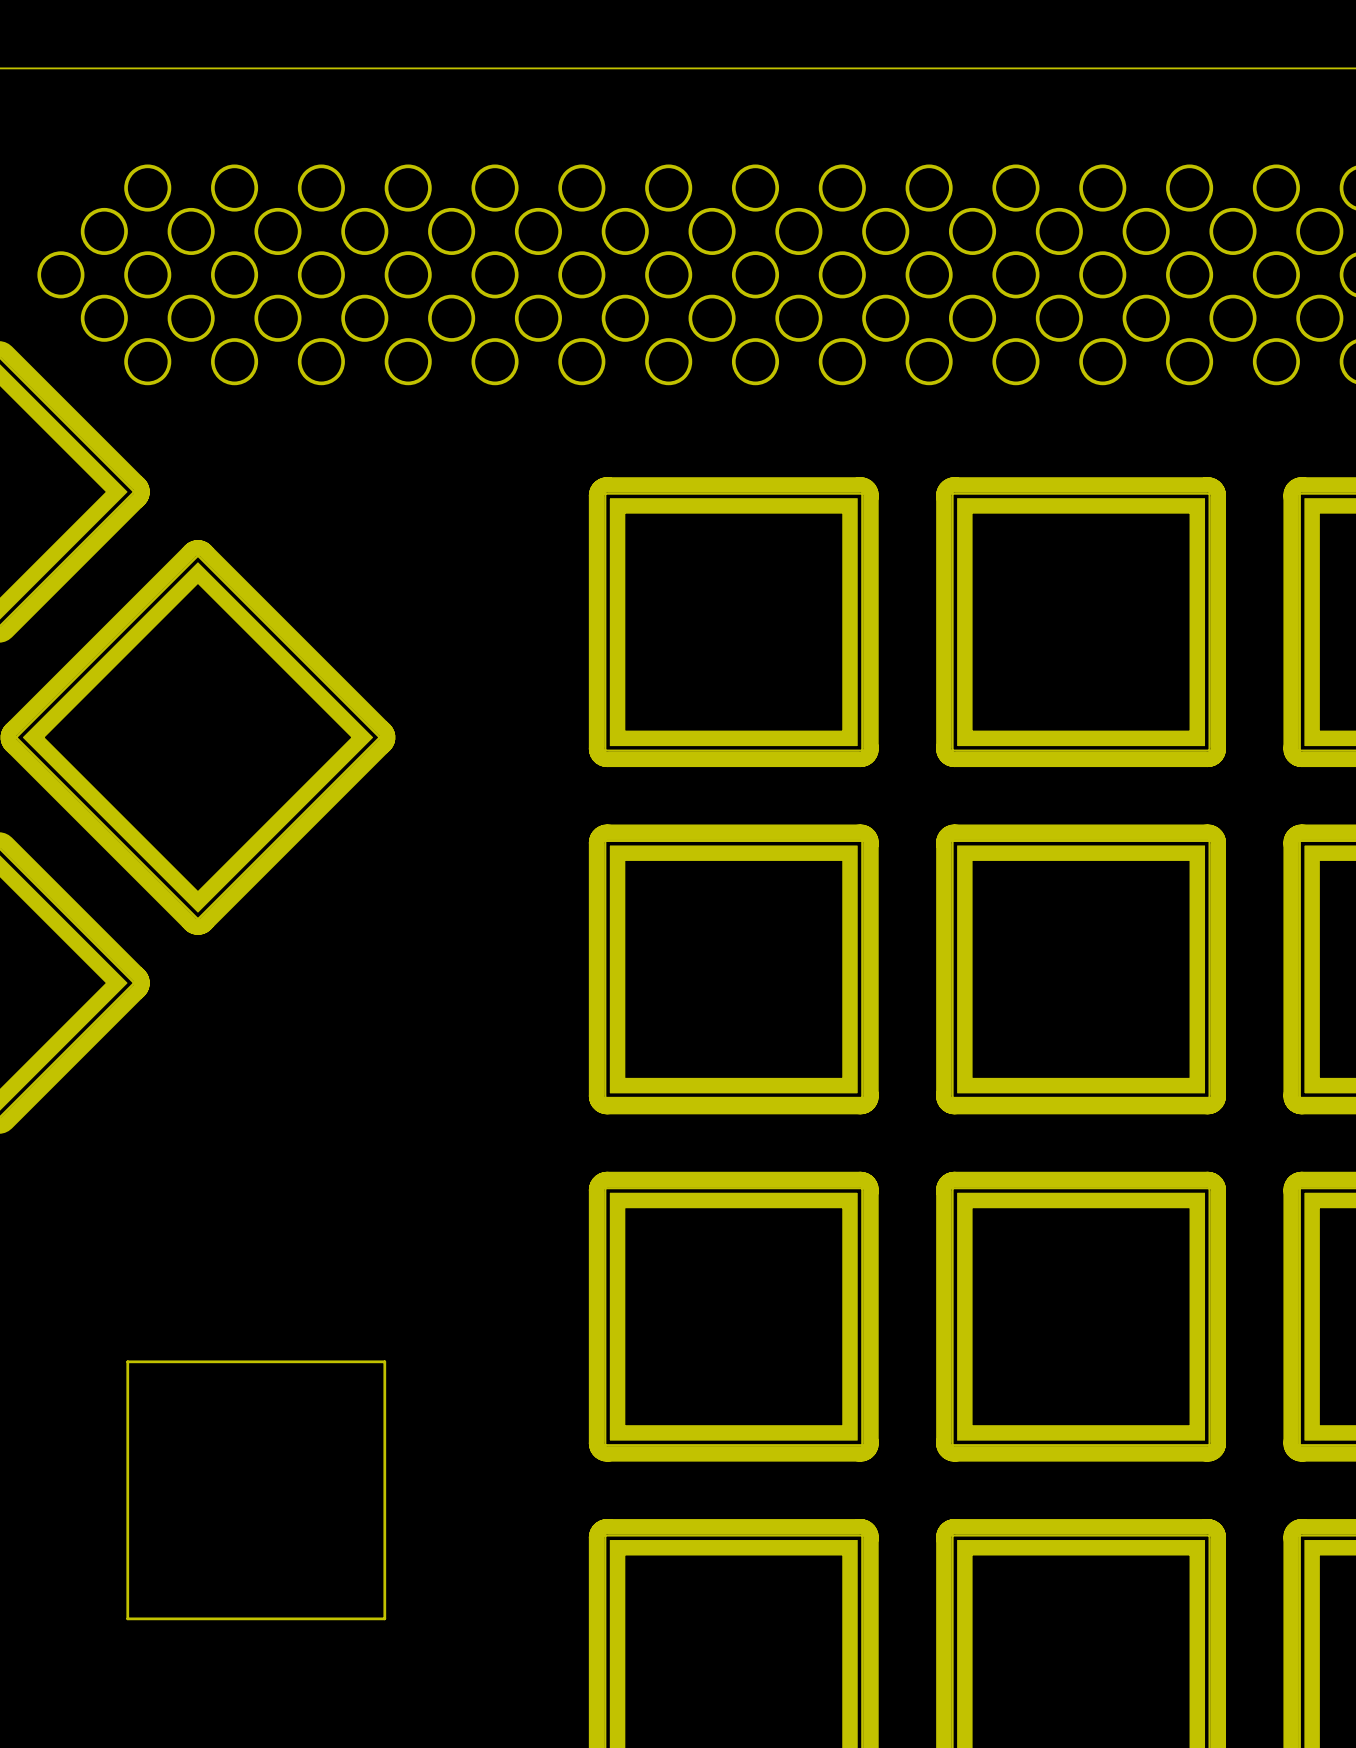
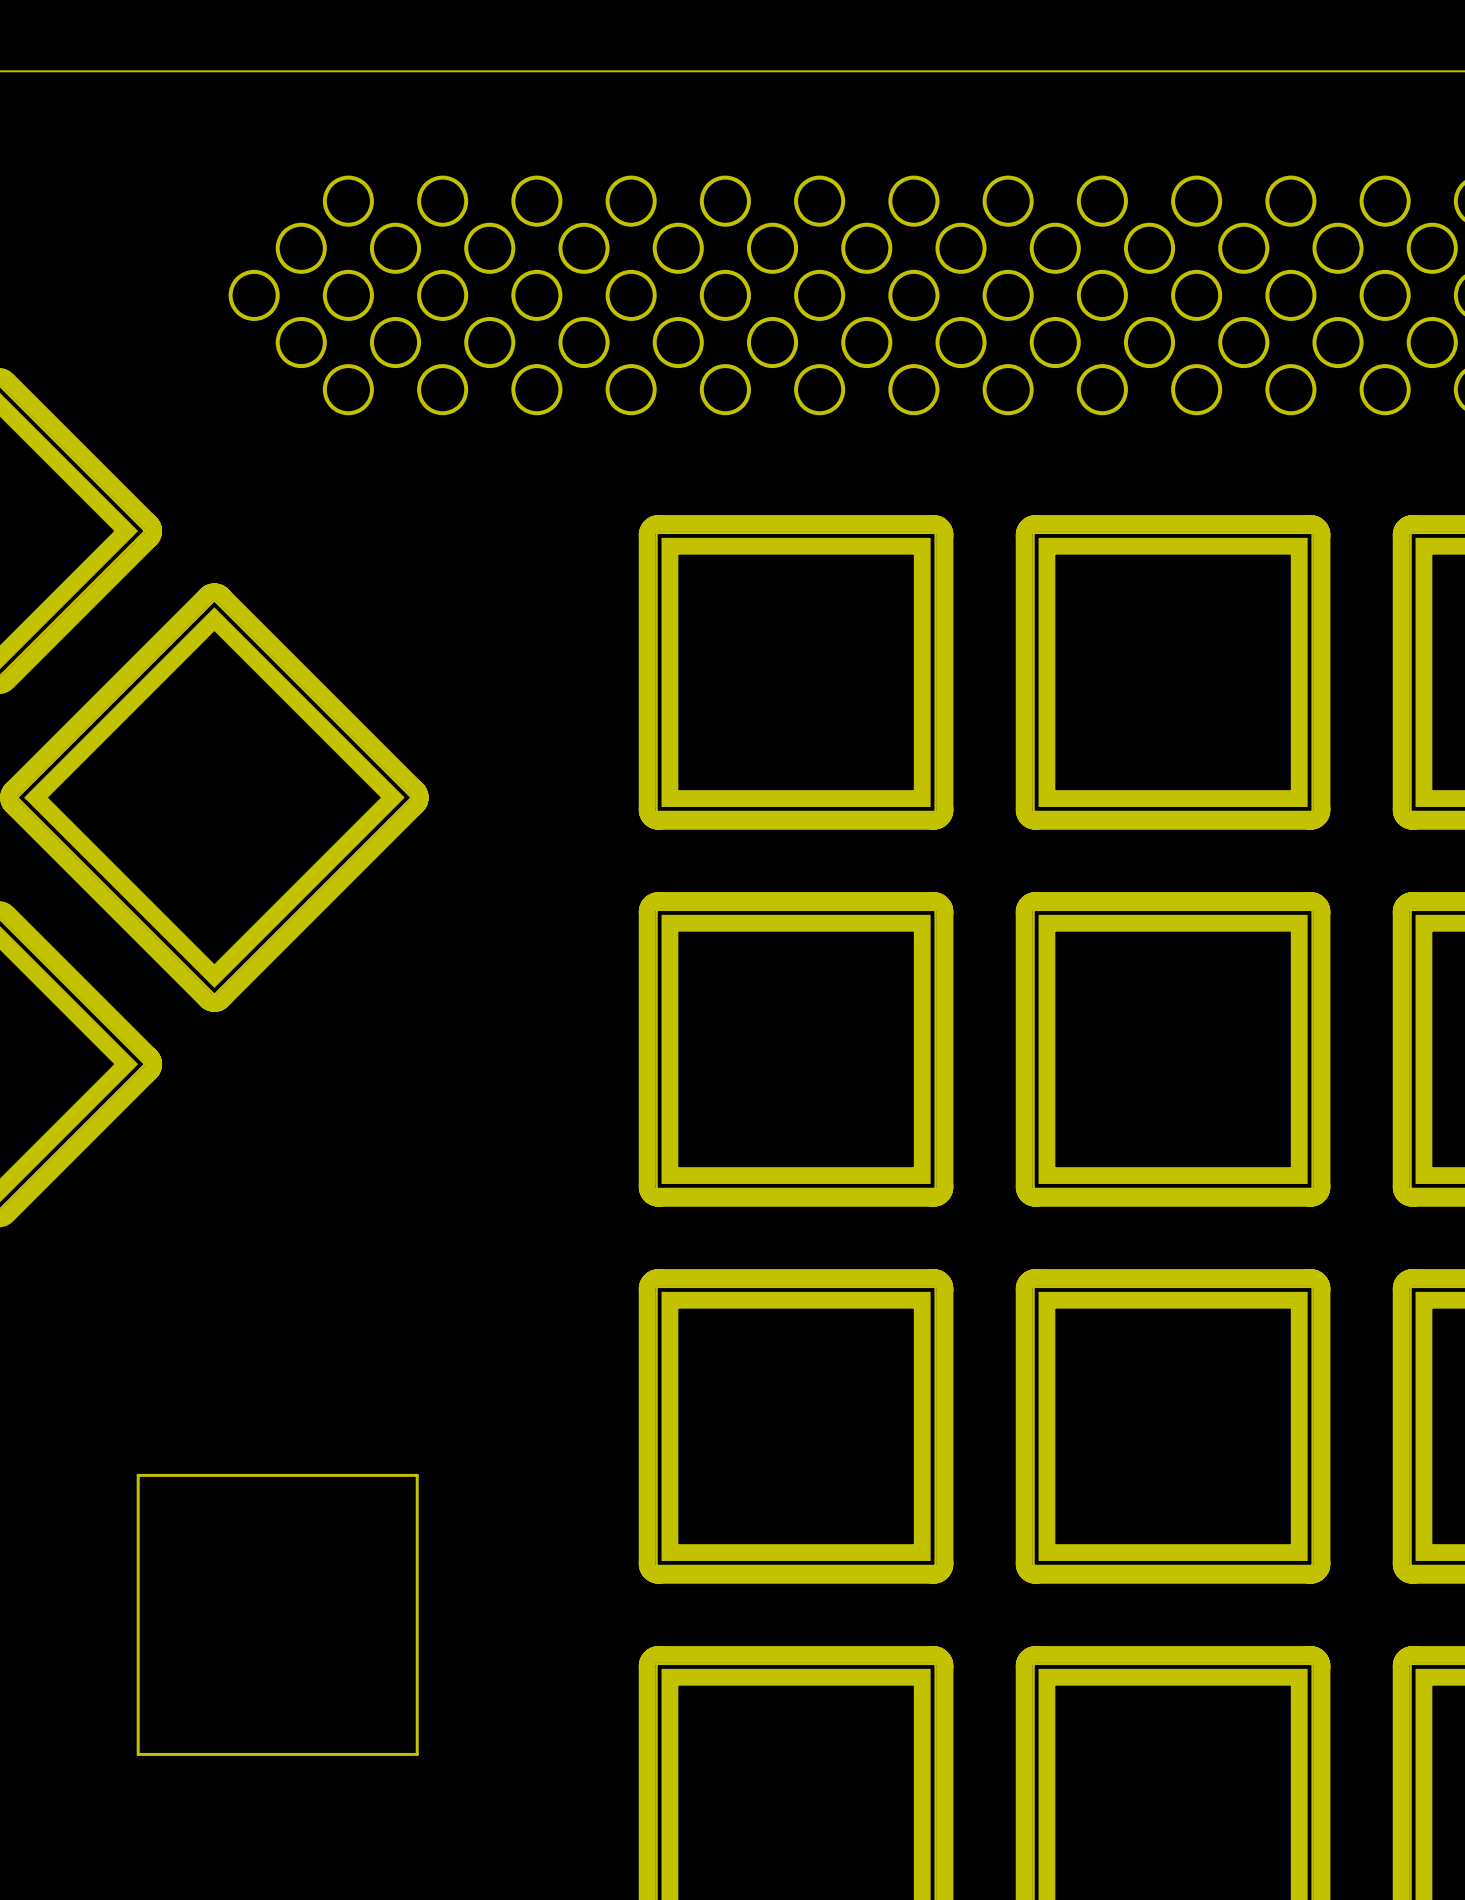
round board edge: [124, 164, 172, 212] -> none
round board edge: [211, 164, 259, 212] -> none
round board edge: [80, 207, 128, 255] -> none
round board edge: [167, 207, 215, 255] -> none
round board edge: [37, 251, 85, 299] -> none
round board edge: [124, 251, 172, 299] -> none
round board edge: [80, 294, 128, 342] -> none
round board edge: [167, 294, 215, 342] -> none
round board edge: [124, 338, 172, 386] -> none
round board edge: [211, 338, 259, 386] -> none

